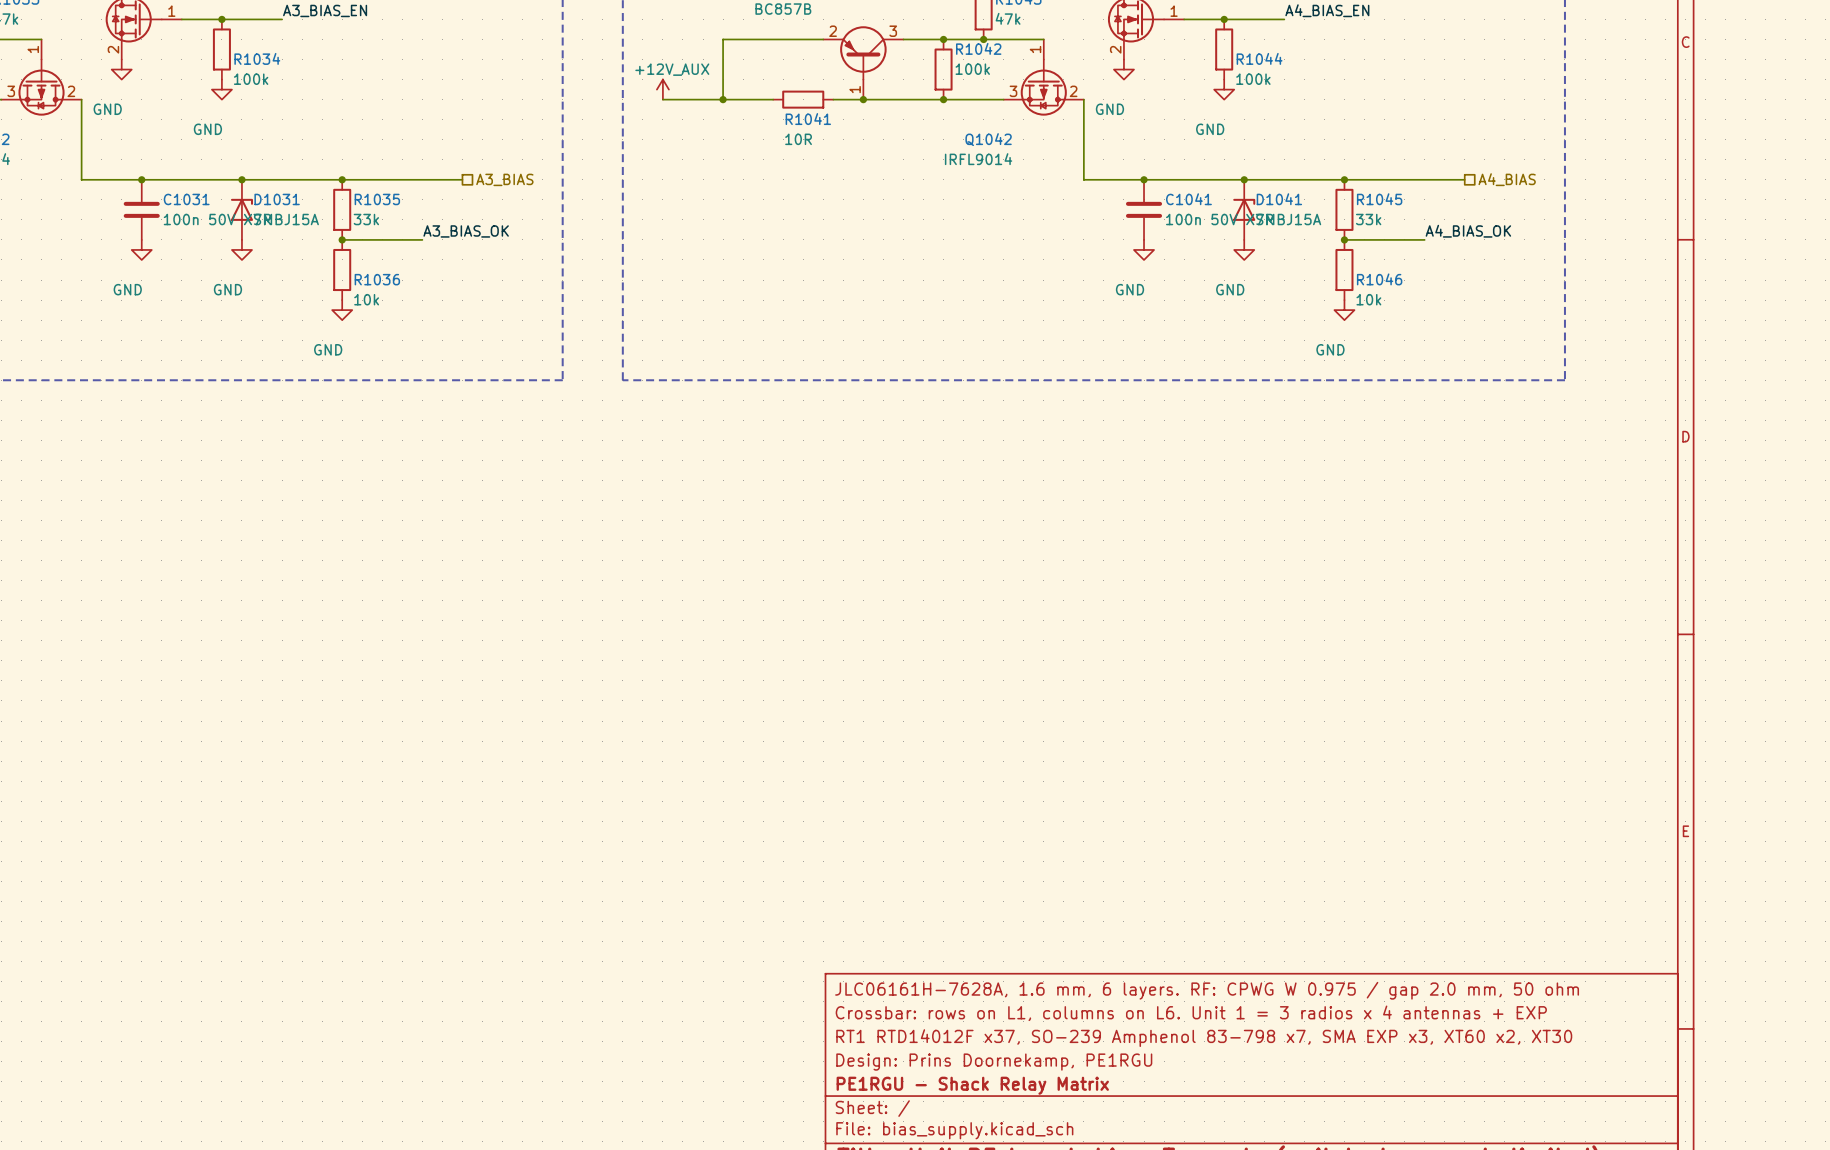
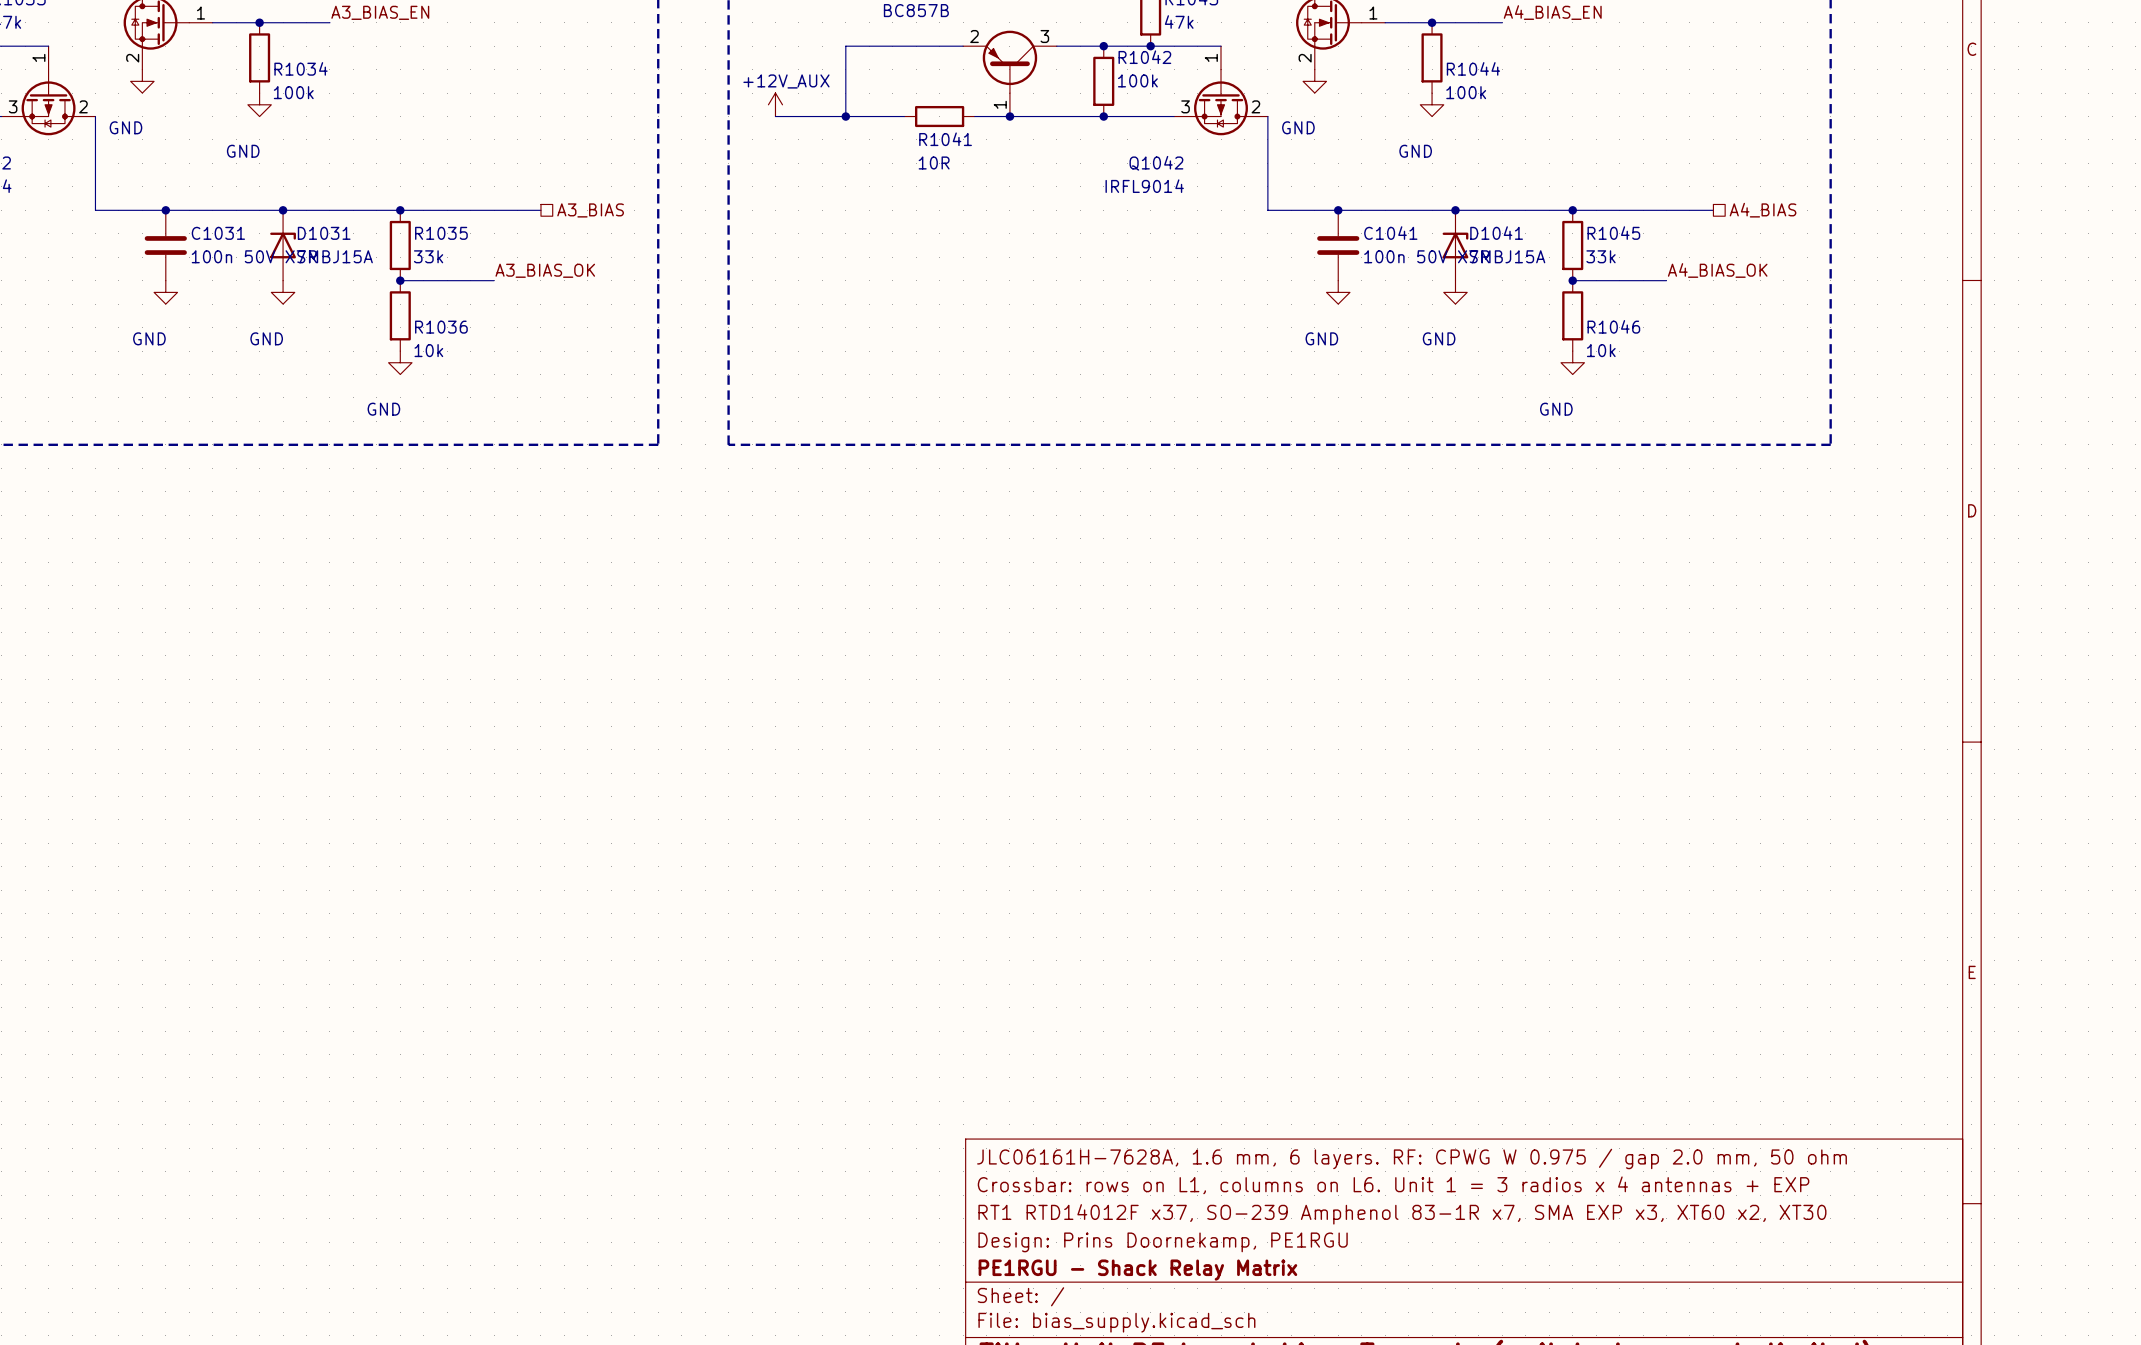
title block: RT1 RTD14012F x37, SO-239 Amphenol 83-798 x7, SMA EXP x3, XT60 x2, XT30 (1204, 1038) -> RT1 RTD14012F x37, SO-239 Amphenol 83-1R x7, SMA EXP x3, XT60 x2, XT30 (1402, 1214)

